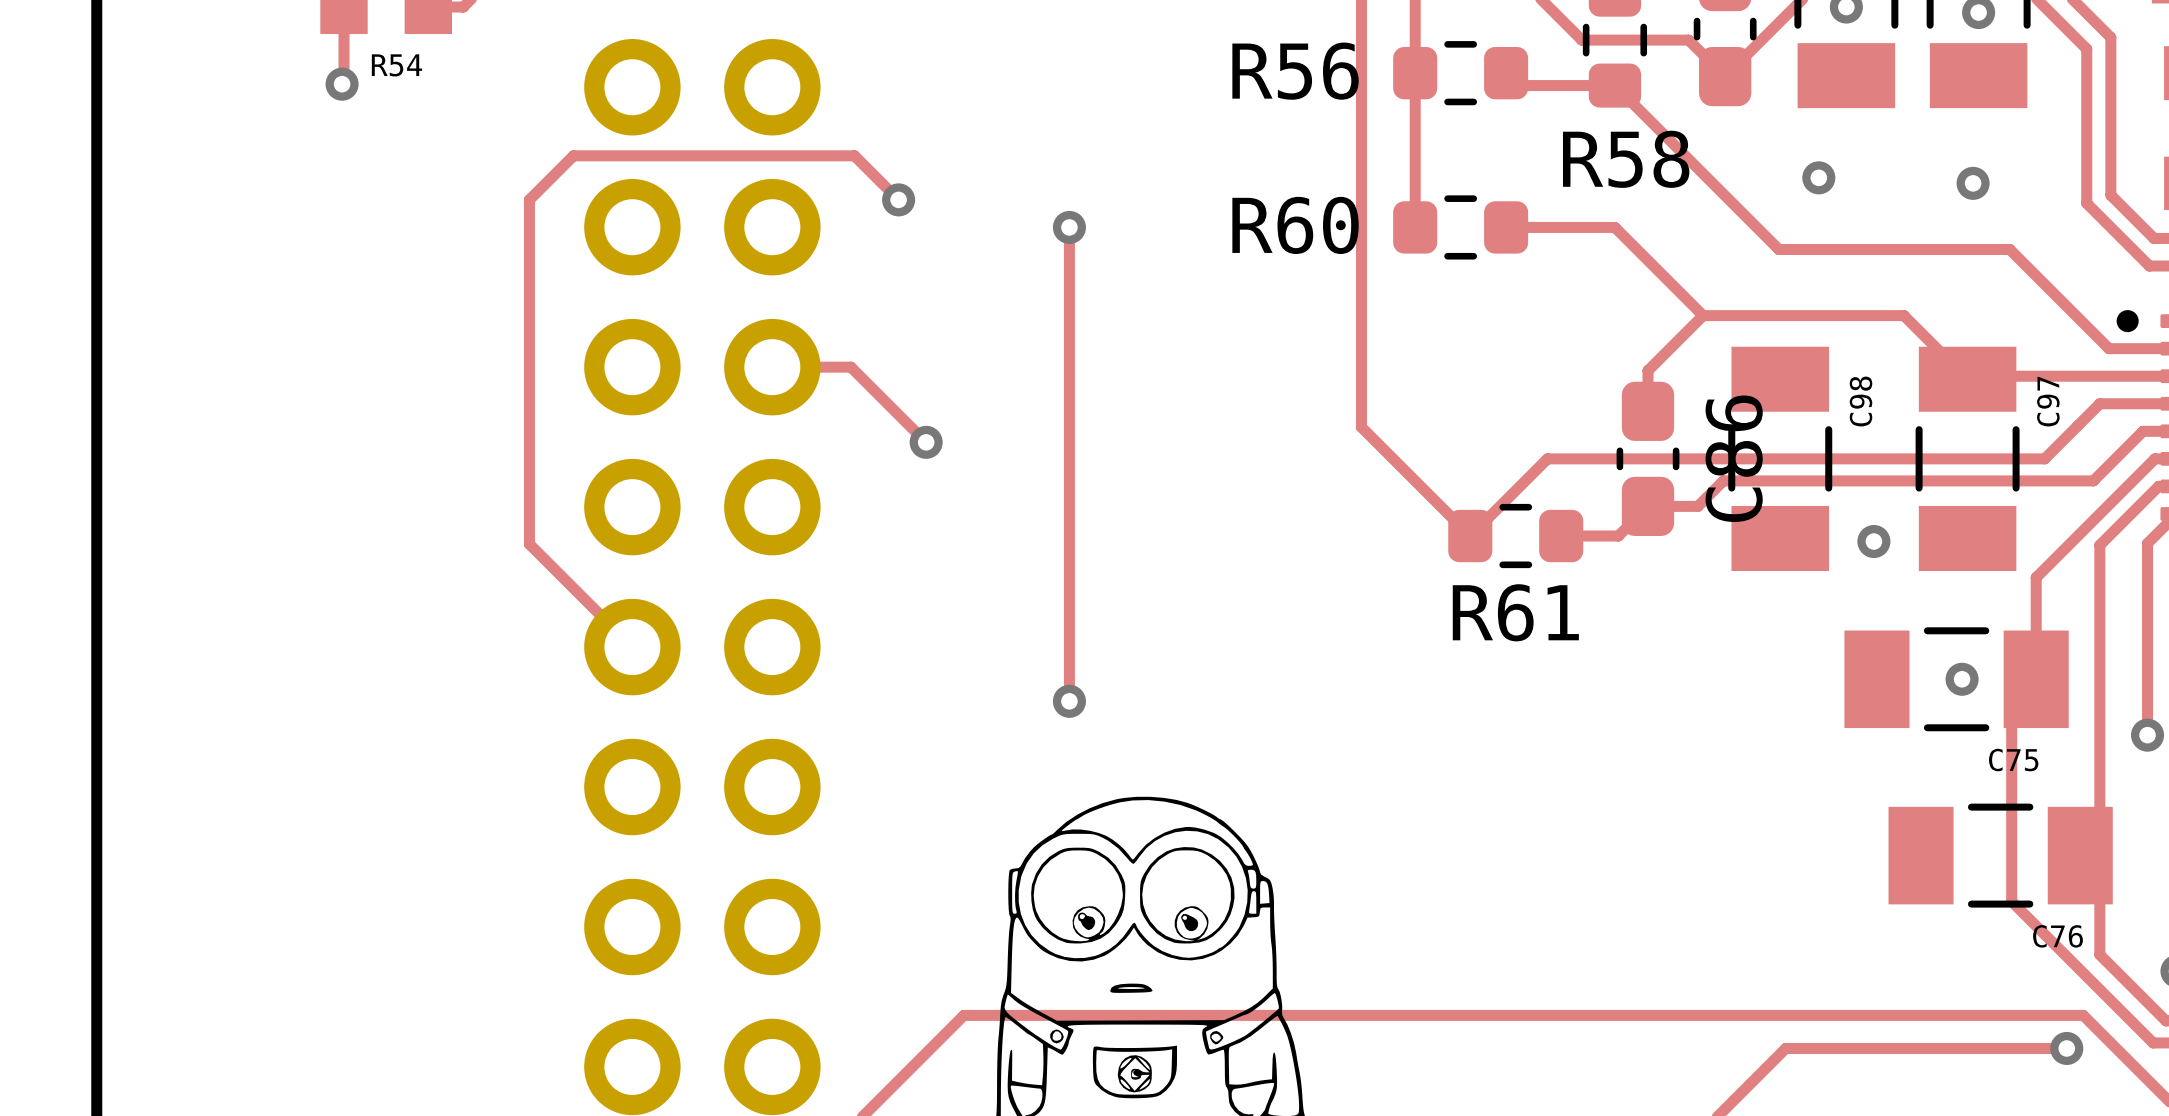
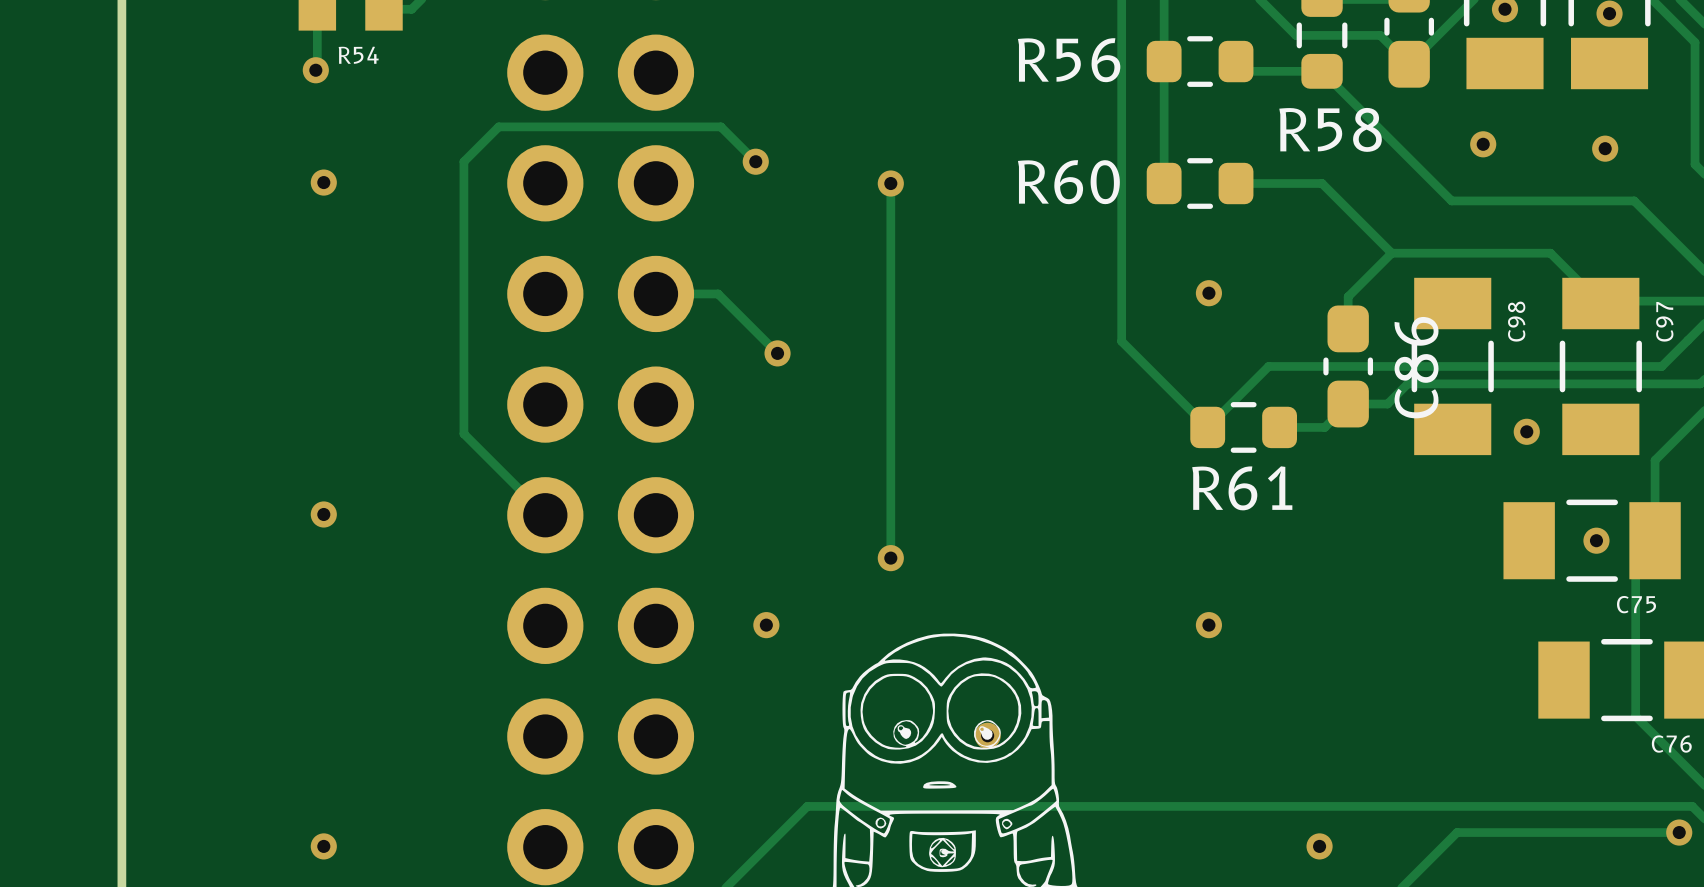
via: none -> (323, 182)
via: none -> (1208, 293)
via: none -> (323, 514)
via: none -> (766, 625)
via: none -> (1208, 625)
via: none -> (987, 735)
via: none -> (323, 846)
via: none -> (1319, 846)

